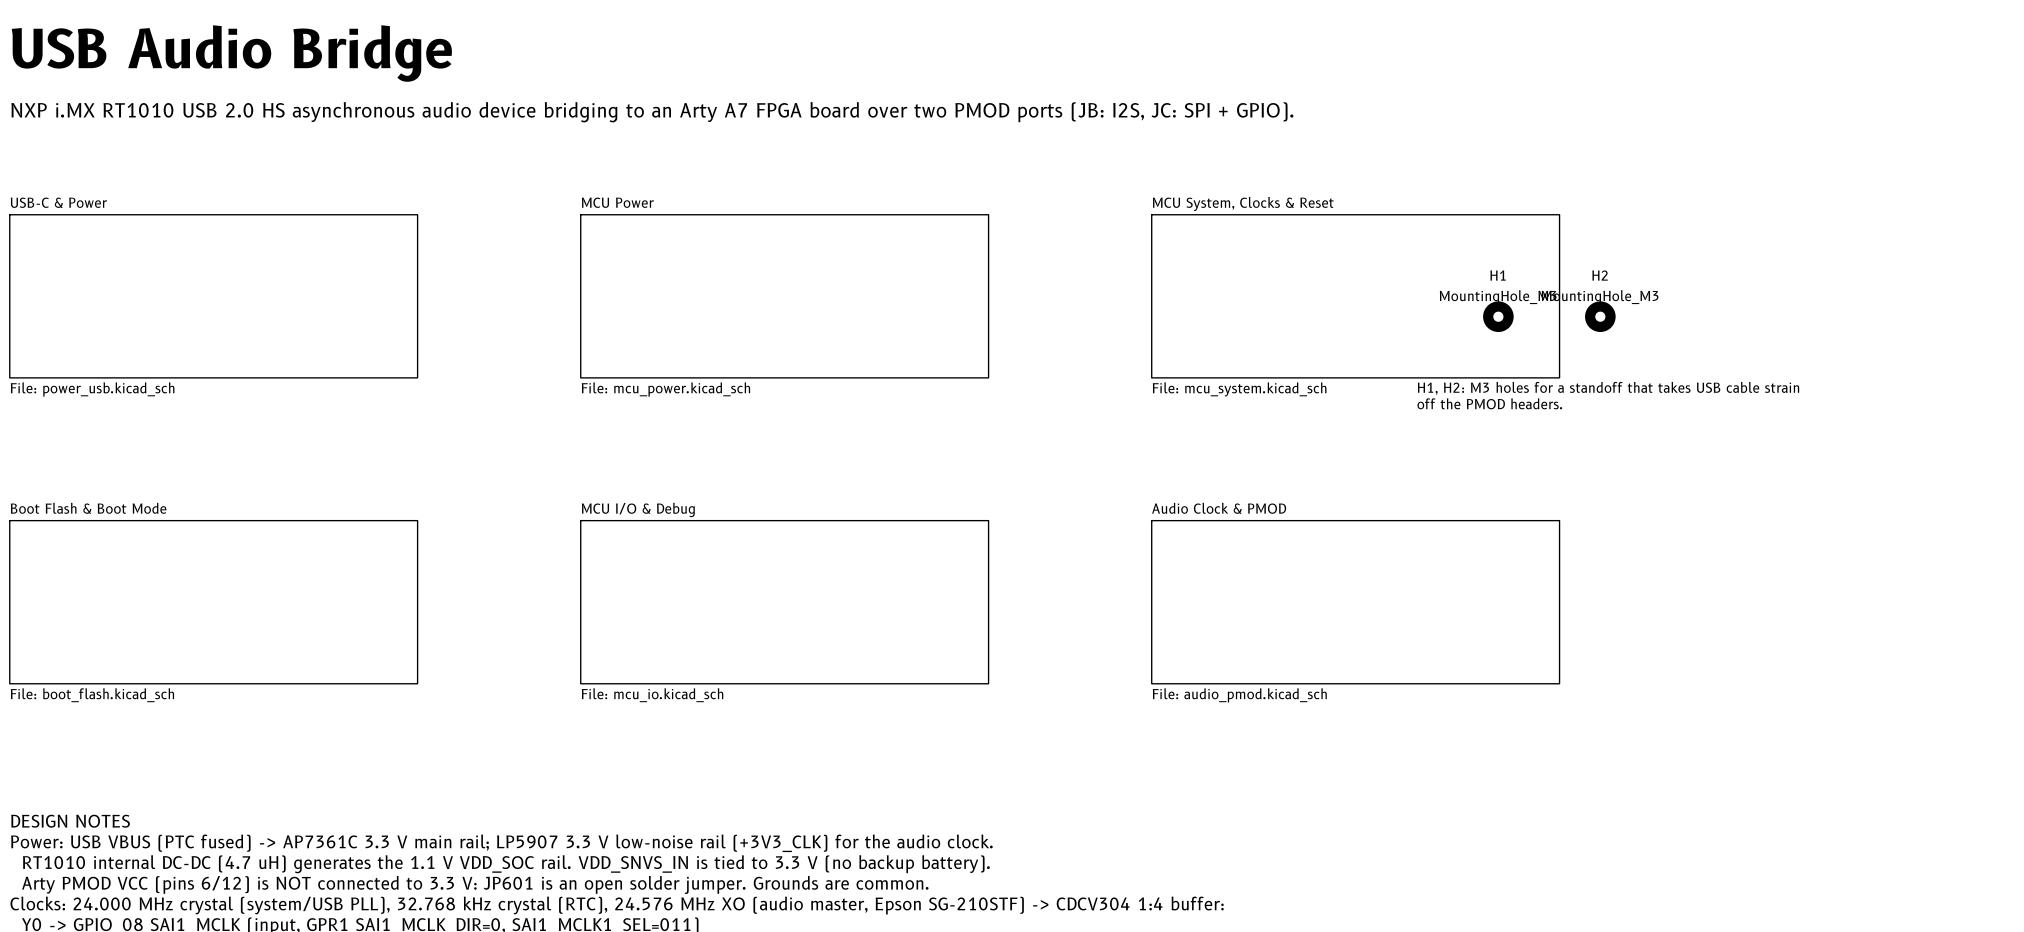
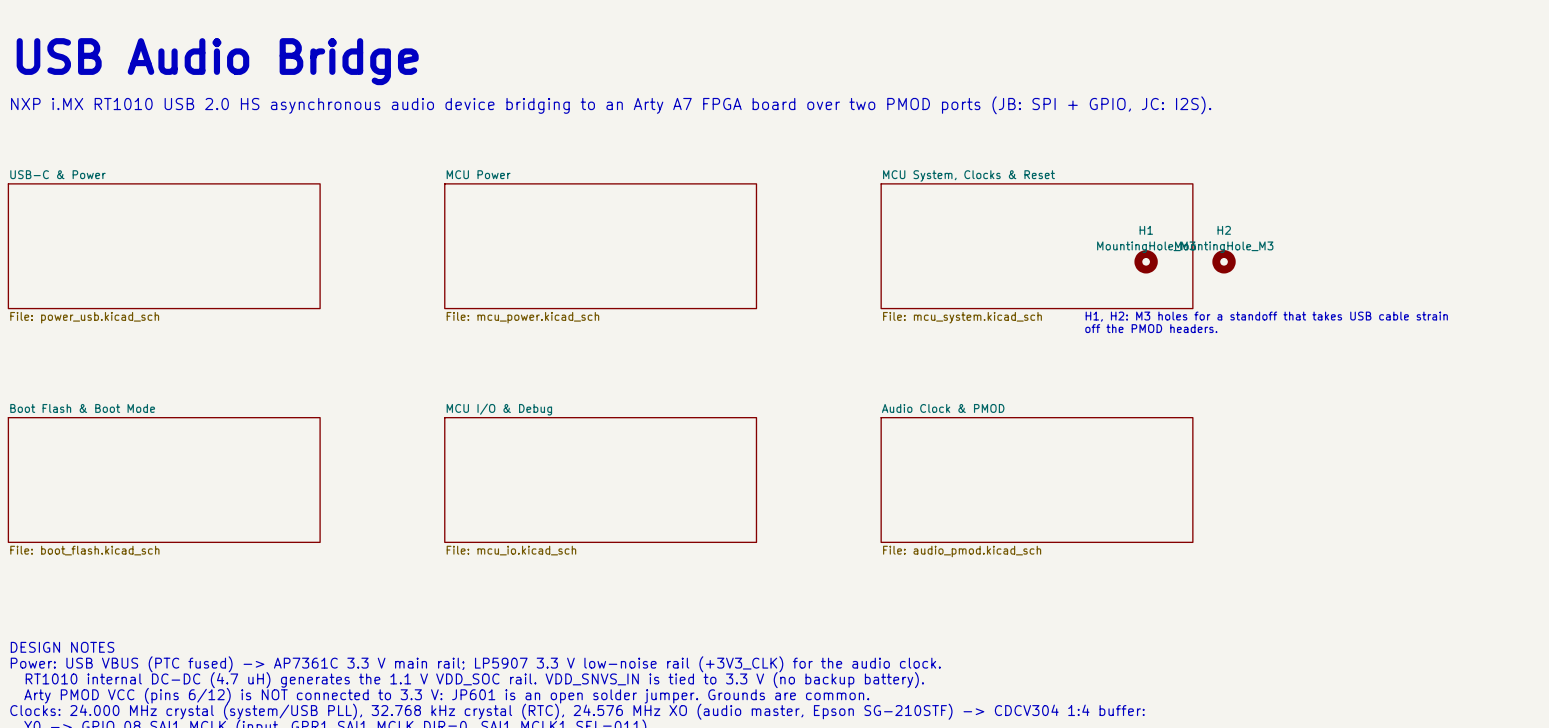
text: NXP i.MX RT1010 USB 2.0 HS asynchronous audio device bridging to an Arty A7 FPGA board over two PMOD ports (JB: I2S, JC: SPI + GPIO). (652, 112) -> NXP i.MX RT1010 USB 2.0 HS asynchronous audio device bridging to an Arty A7 FPGA board over two PMOD ports (JB: SPI + GPIO, JC: I2S). (611, 105)

